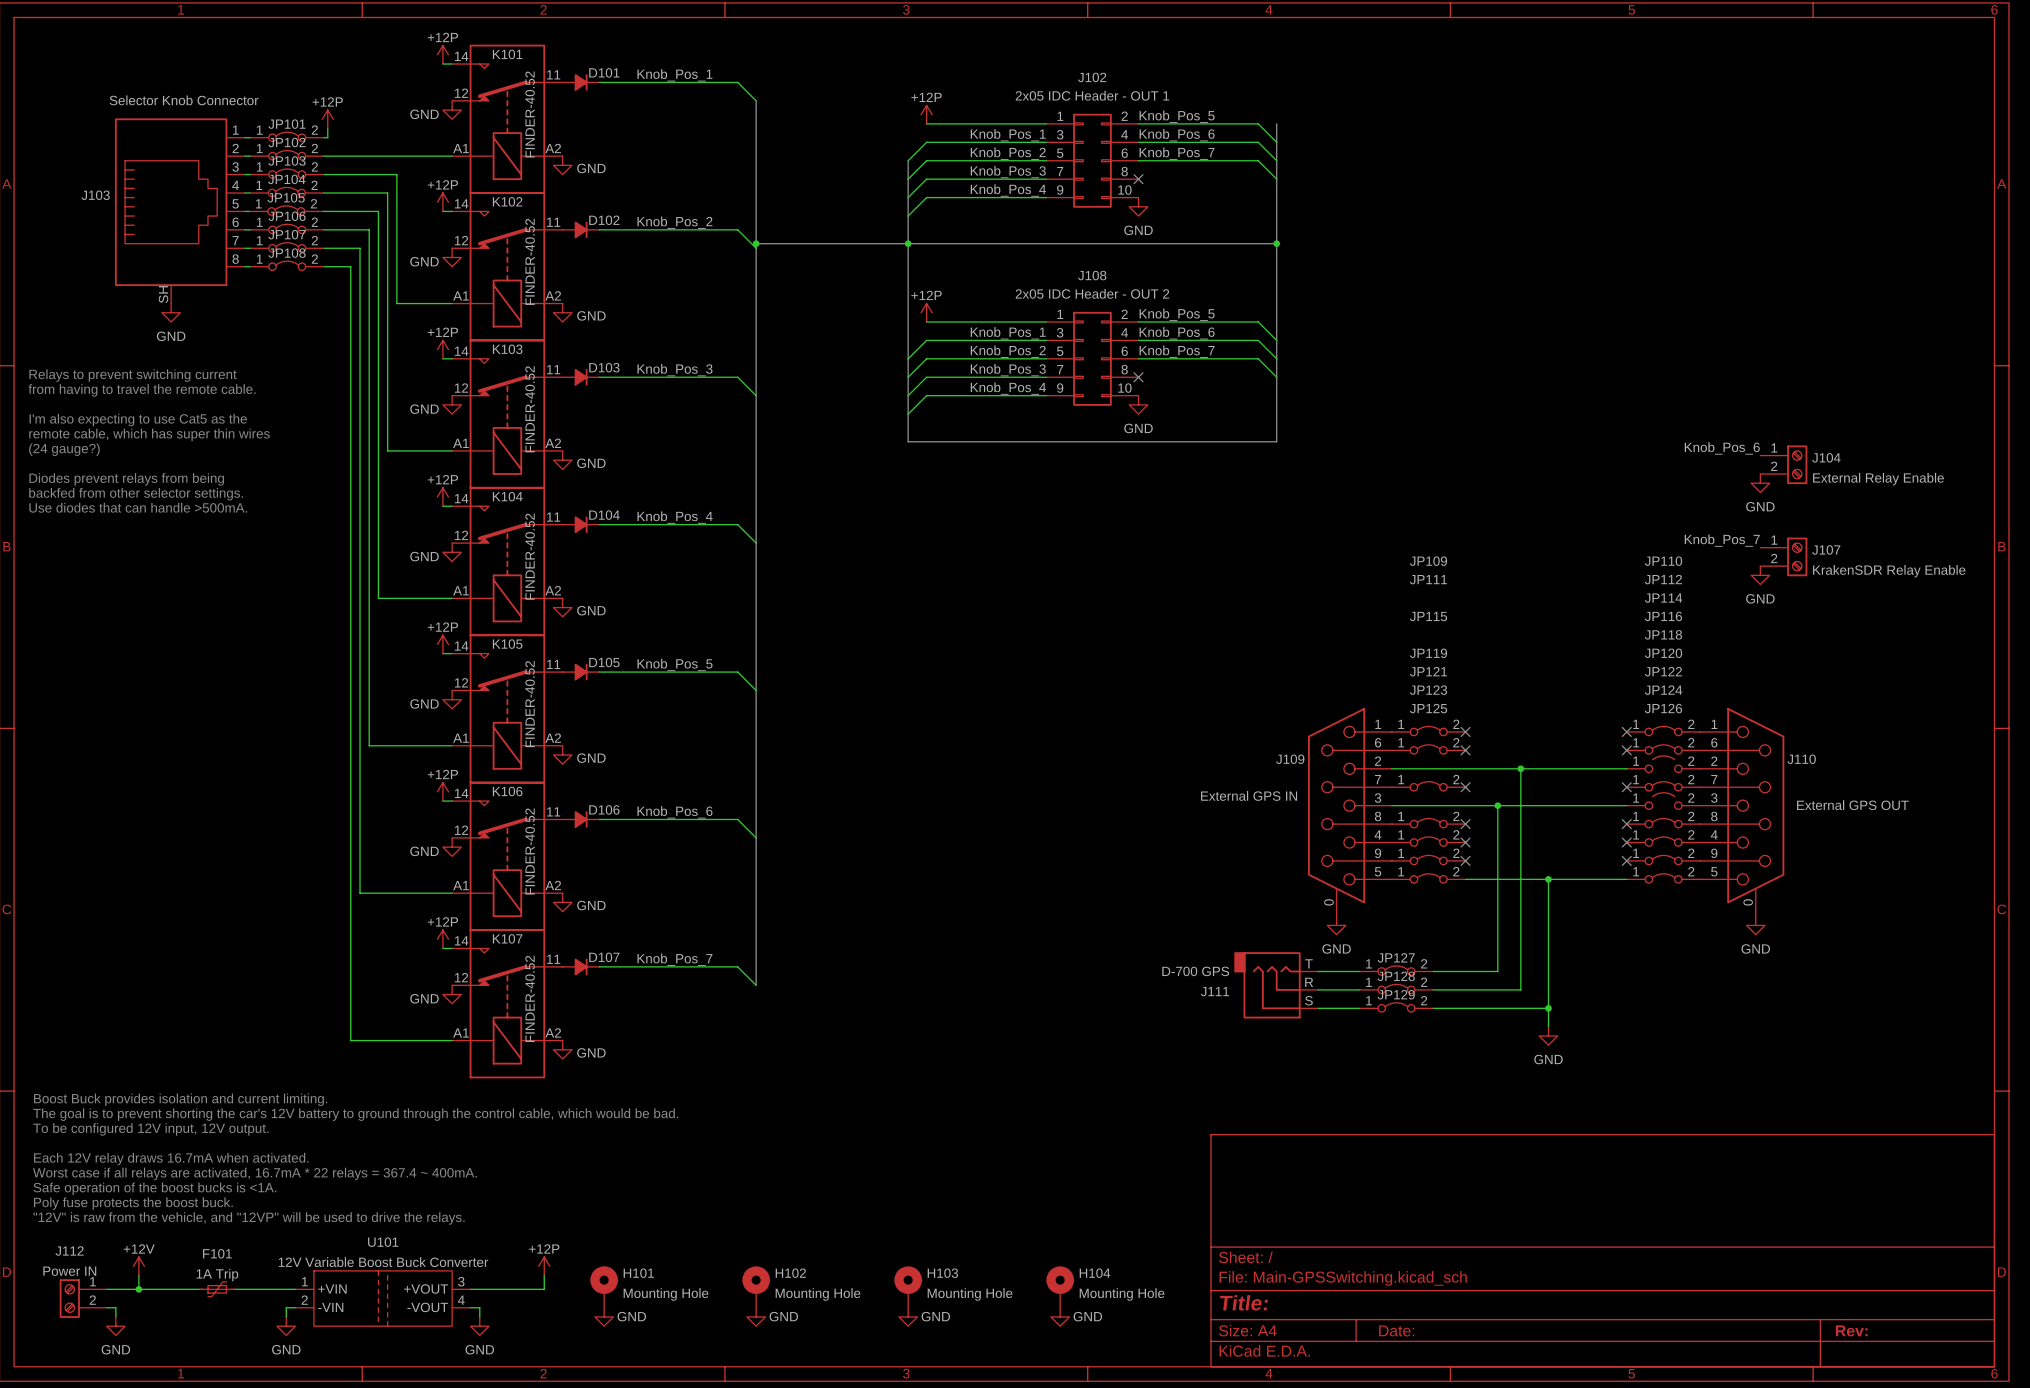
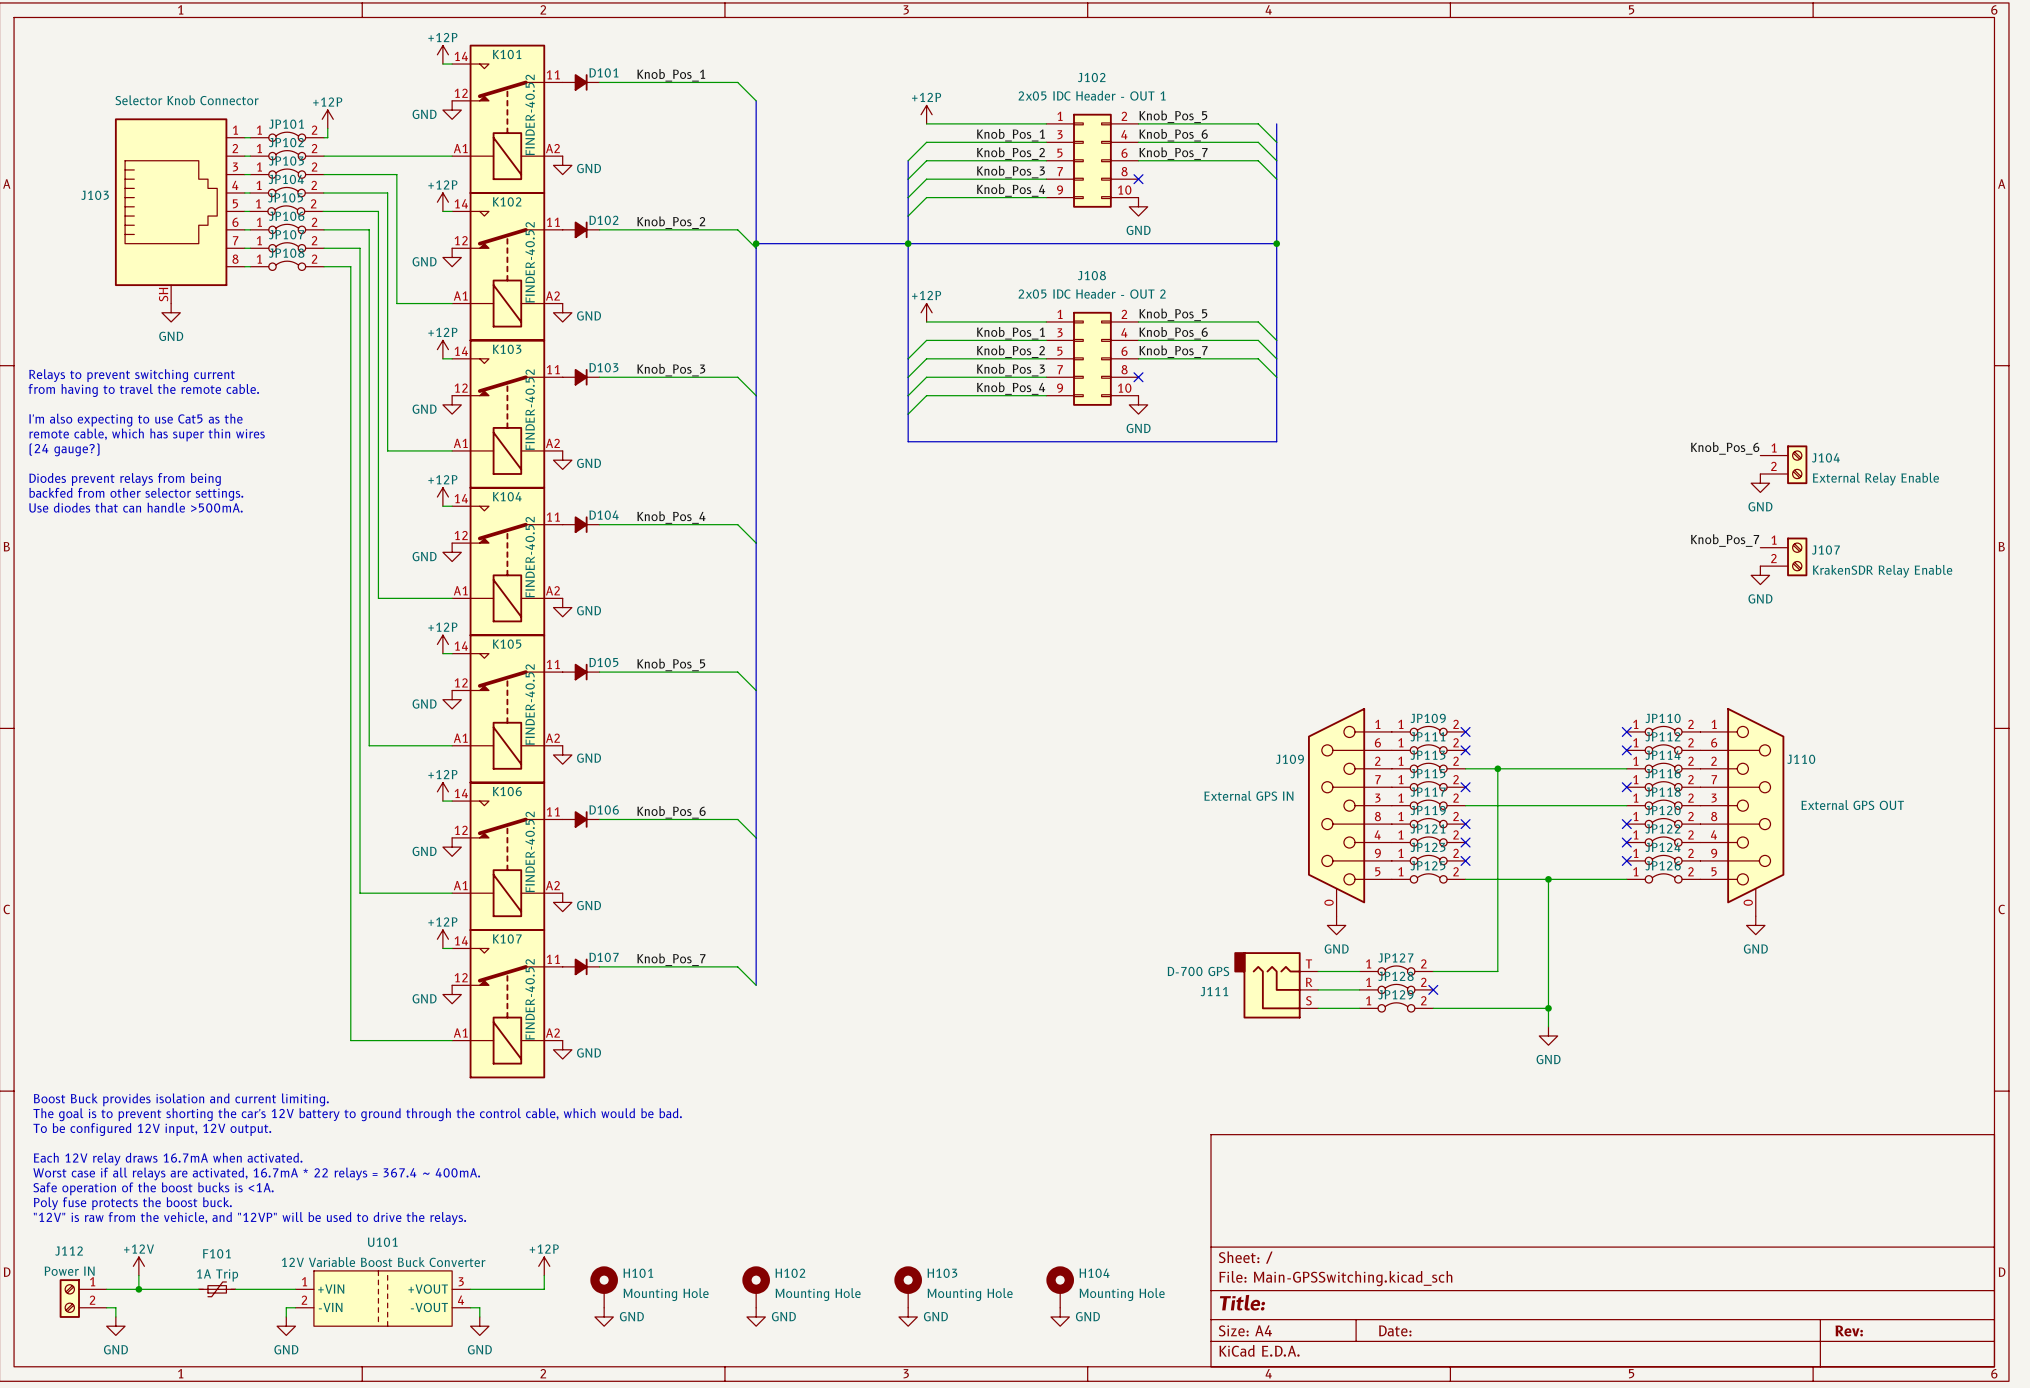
JP109 name position: JP109 (1428, 561) -> JP109 (1428, 718)
JP110 name position: JP110 (1663, 561) -> JP110 (1663, 718)
JP111 name position: JP111 (1428, 579) -> JP111 (1427, 736)
JP112 name position: JP112 (1663, 579) -> JP112 (1662, 736)
JP114 name position: JP114 (1663, 598) -> JP114 (1663, 755)
JP115 name position: JP115 (1428, 616) -> JP115 (1427, 773)
JP116 name position: JP116 (1663, 616) -> JP116 (1663, 773)
JP118 name position: JP118 (1663, 634) -> JP118 (1663, 792)
JP119 name position: JP119 (1428, 653) -> JP119 (1428, 810)
JP120 name position: JP120 (1663, 653) -> JP120 (1663, 810)
JP121 name position: JP121 (1428, 671) -> JP121 (1427, 828)
JP122 name position: JP122 (1663, 671) -> JP122 (1662, 828)
JP123 name position: JP123 (1428, 690) -> JP123 (1427, 847)
JP124 name position: JP124 (1663, 690) -> JP124 (1663, 847)
JP125 name position: JP125 (1428, 708) -> JP125 (1427, 865)
JP126 name position: JP126 (1663, 708) -> JP126 (1663, 865)
JP114 symbol: [1626, 755, 1701, 773] -> [1626, 763, 1701, 773]
JP113: none -> (1428, 767)
wire: none -> (1497, 768) (1497, 805)
junction: none -> (1497, 768)
wire: (1520, 768) (1520, 989) (1433, 989) -> none
junction: (1520, 768) -> none
JP118 symbol: [1626, 792, 1701, 810] -> [1626, 800, 1701, 810]
JP117: none -> (1428, 804)
junction: (1497, 805) -> none
no-connect mark: none -> (1433, 989)

